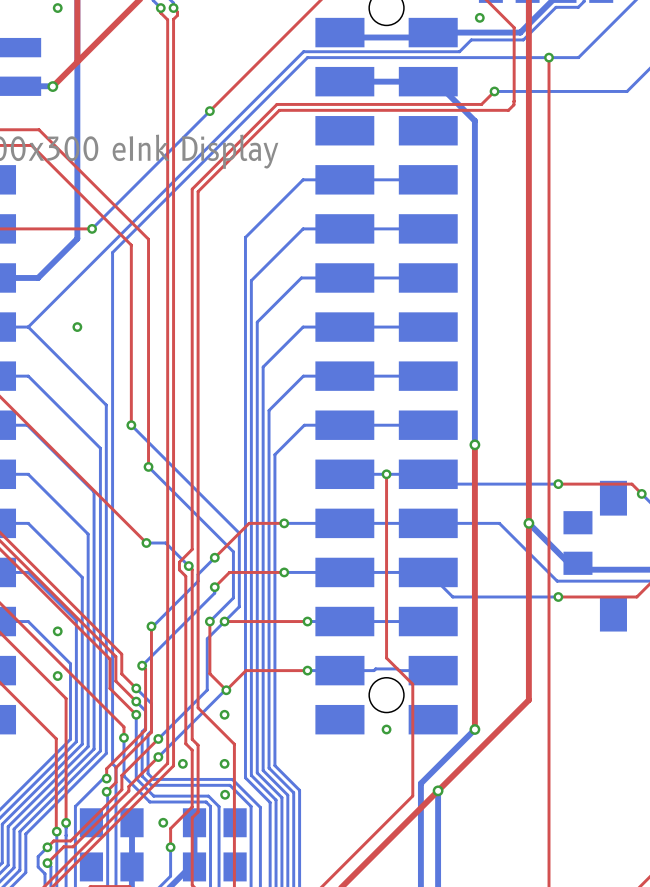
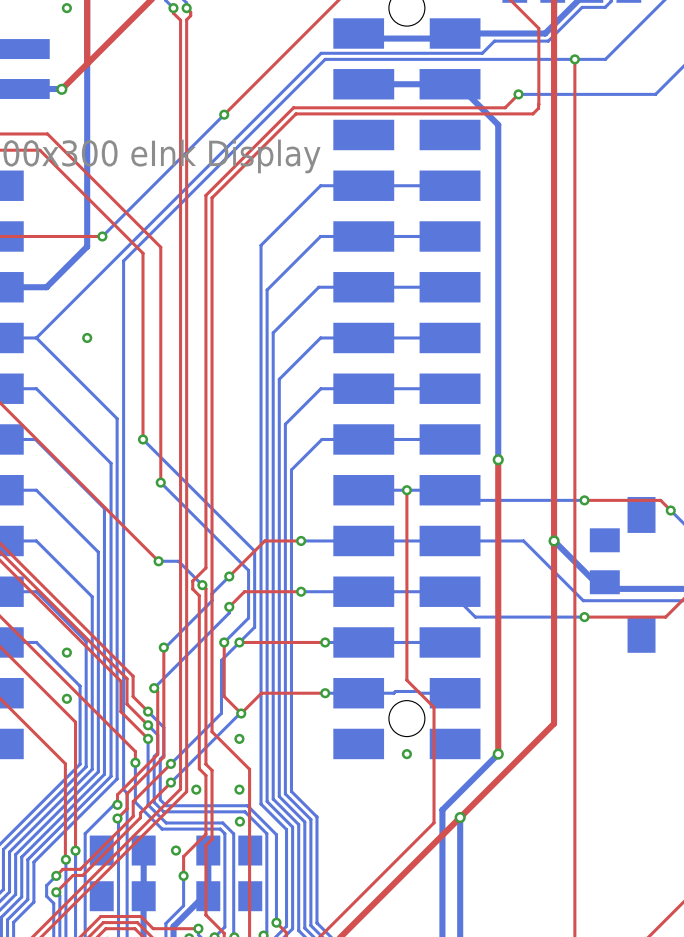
via: (479, 17) -> none

